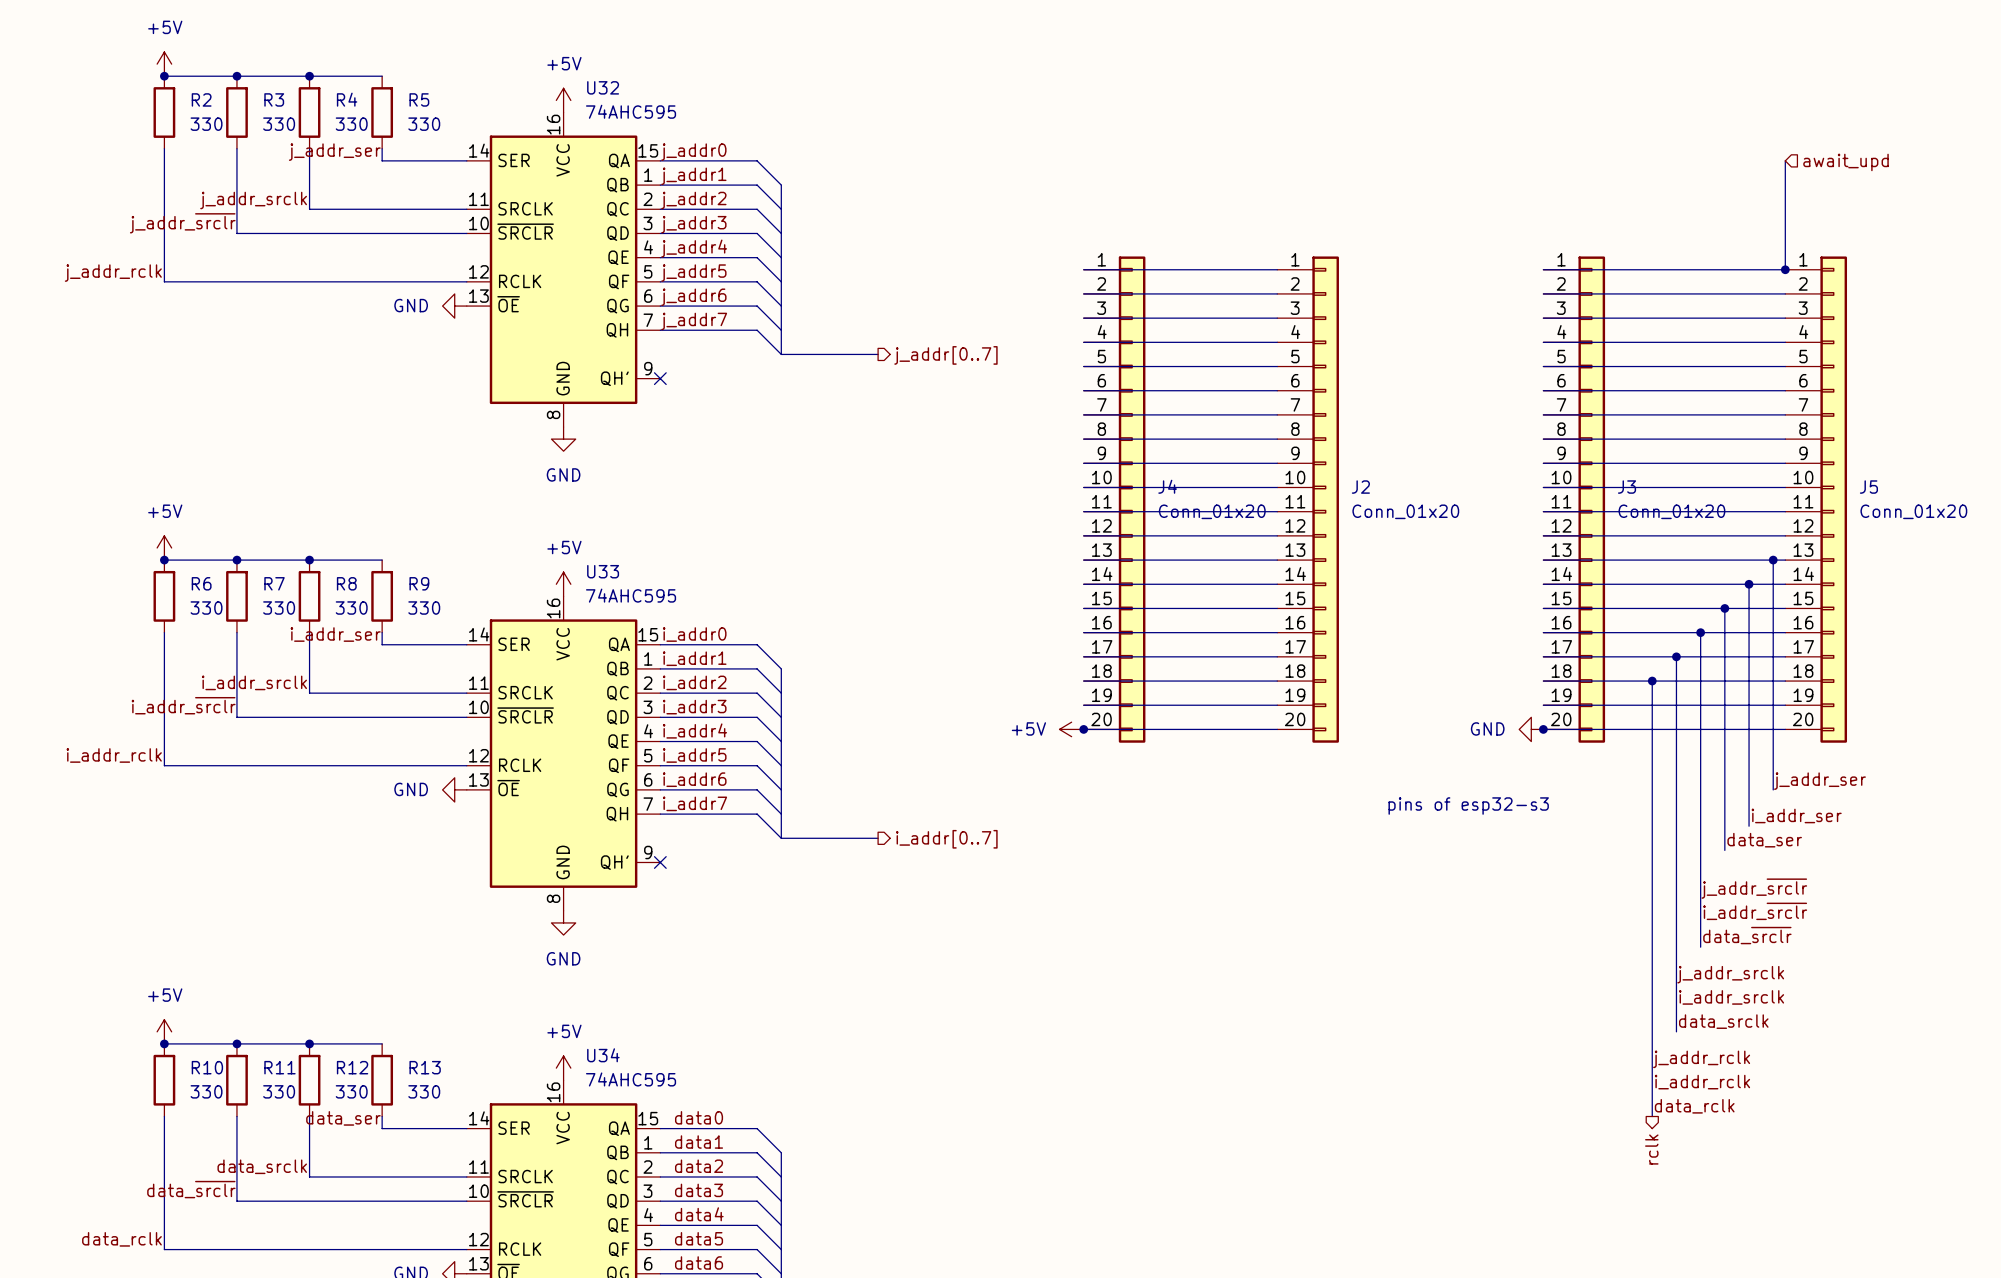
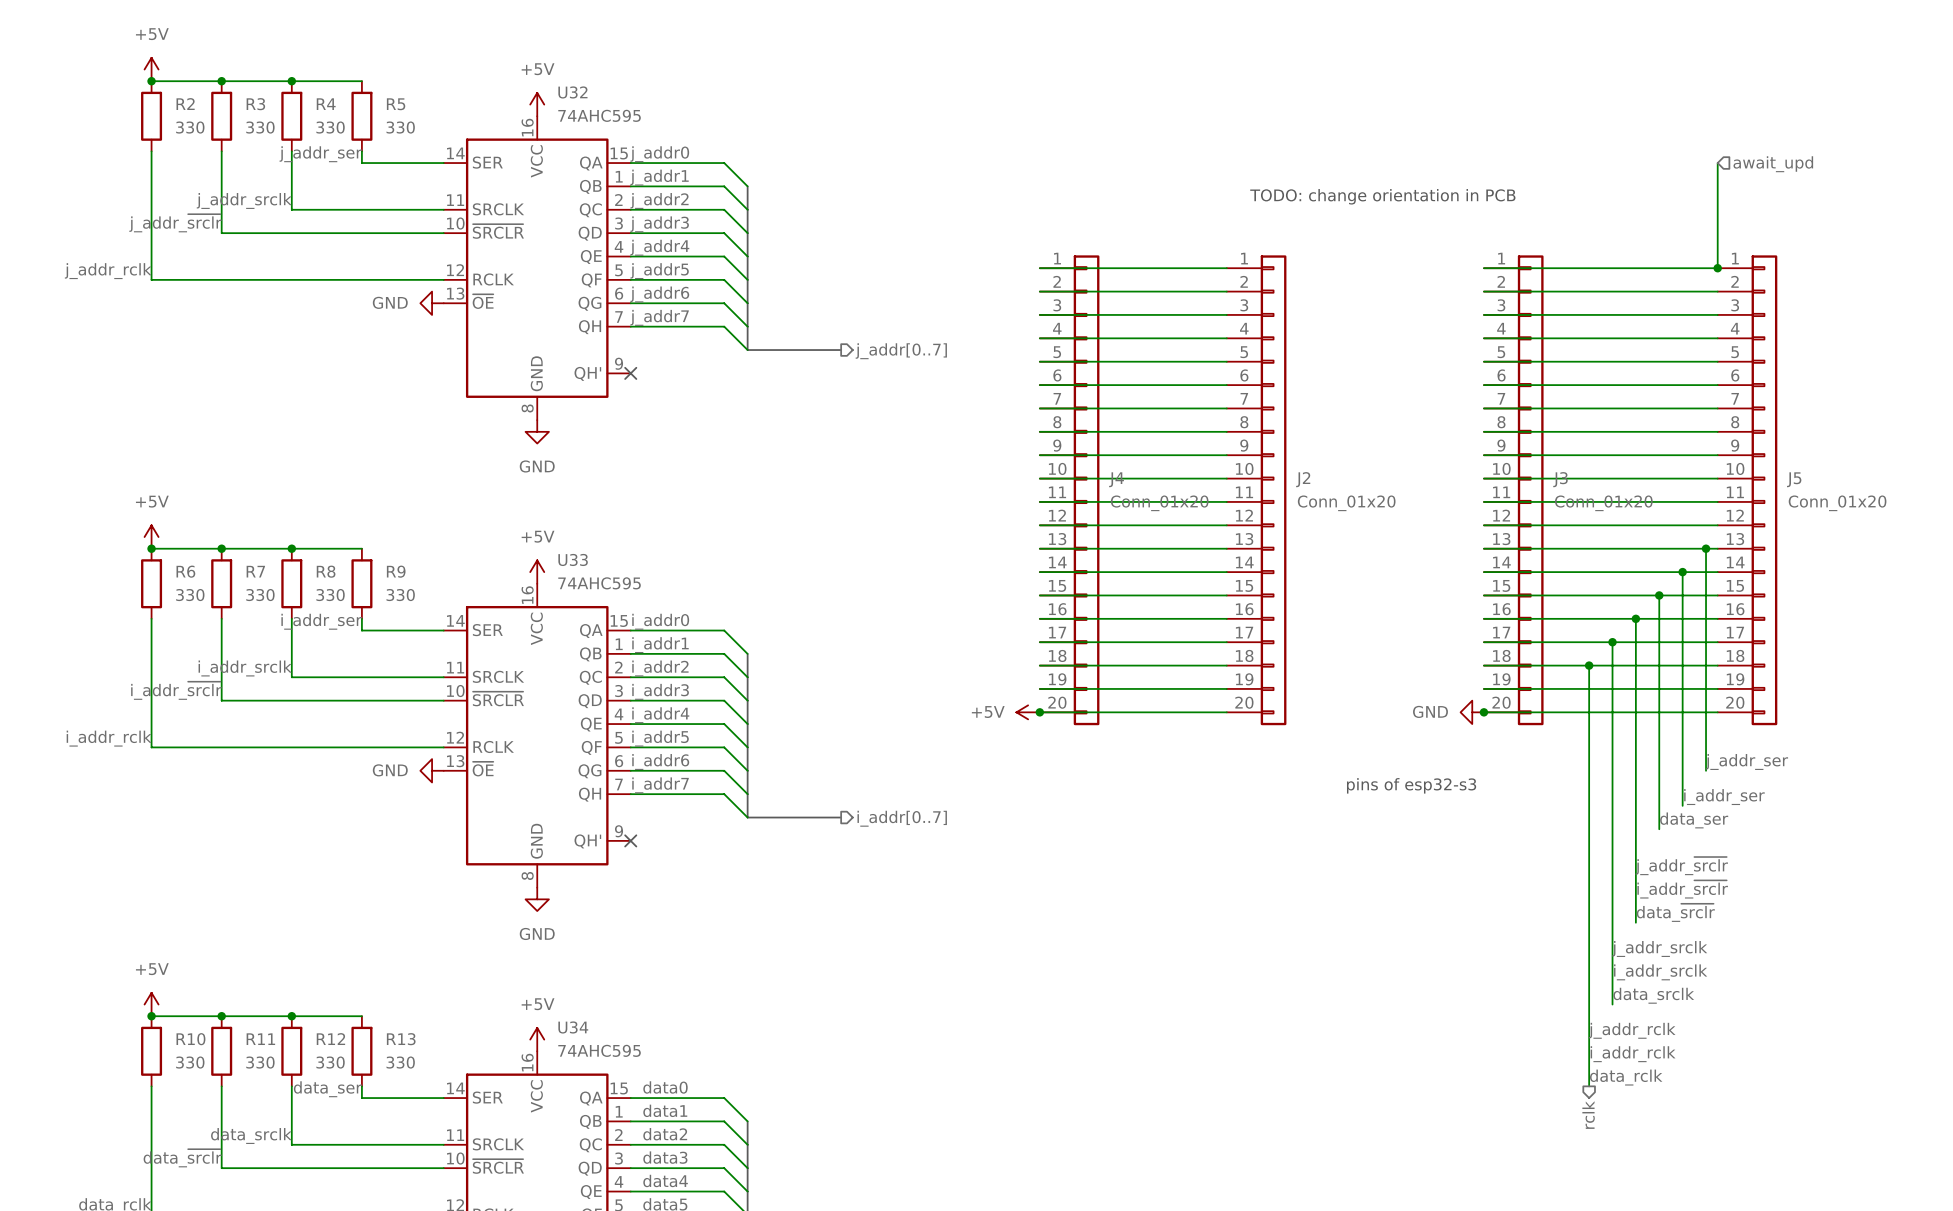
text: none -> TODO: change orientation in PCB (1382, 196)

